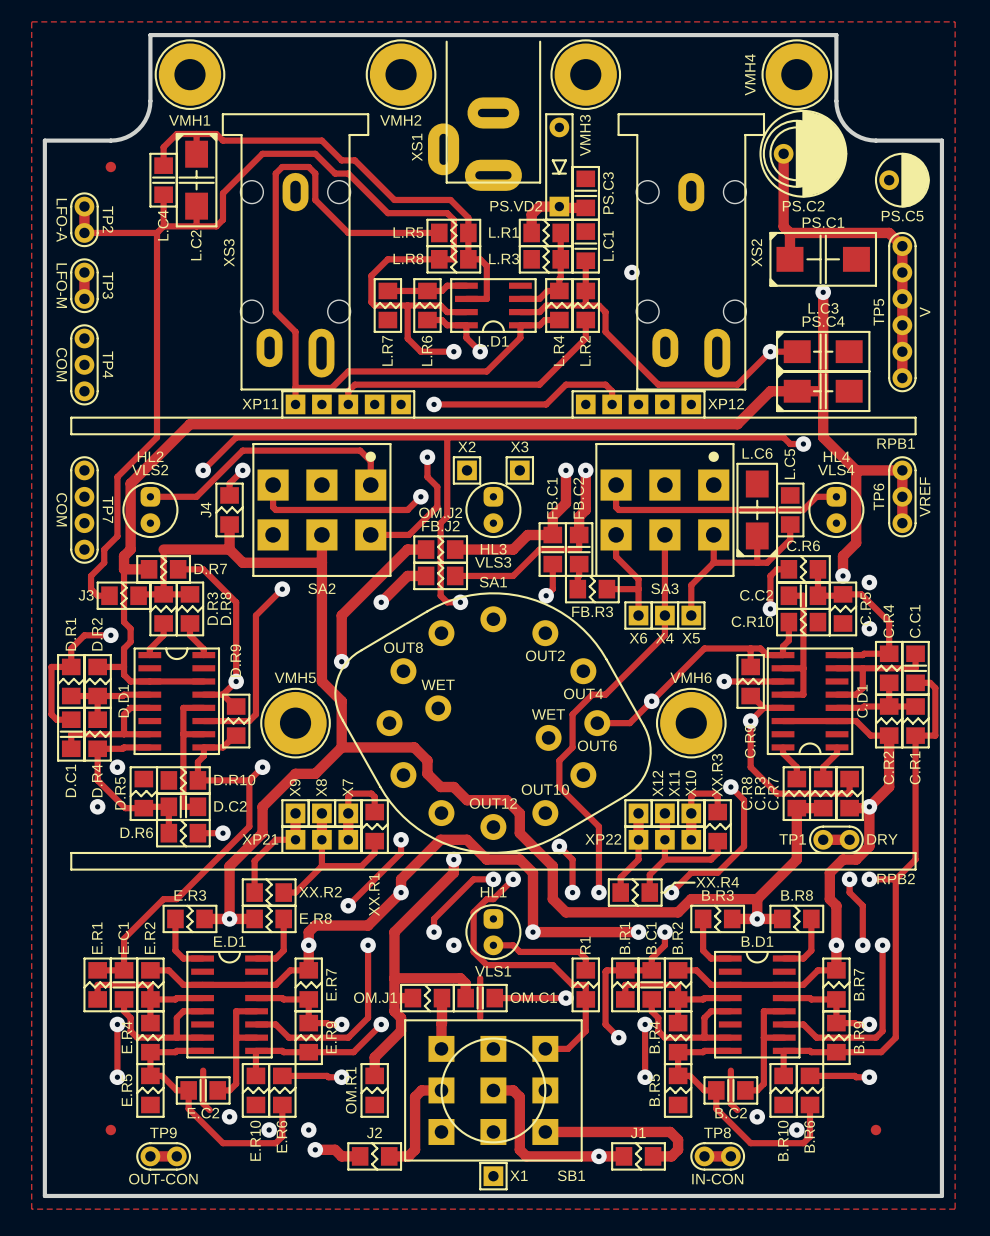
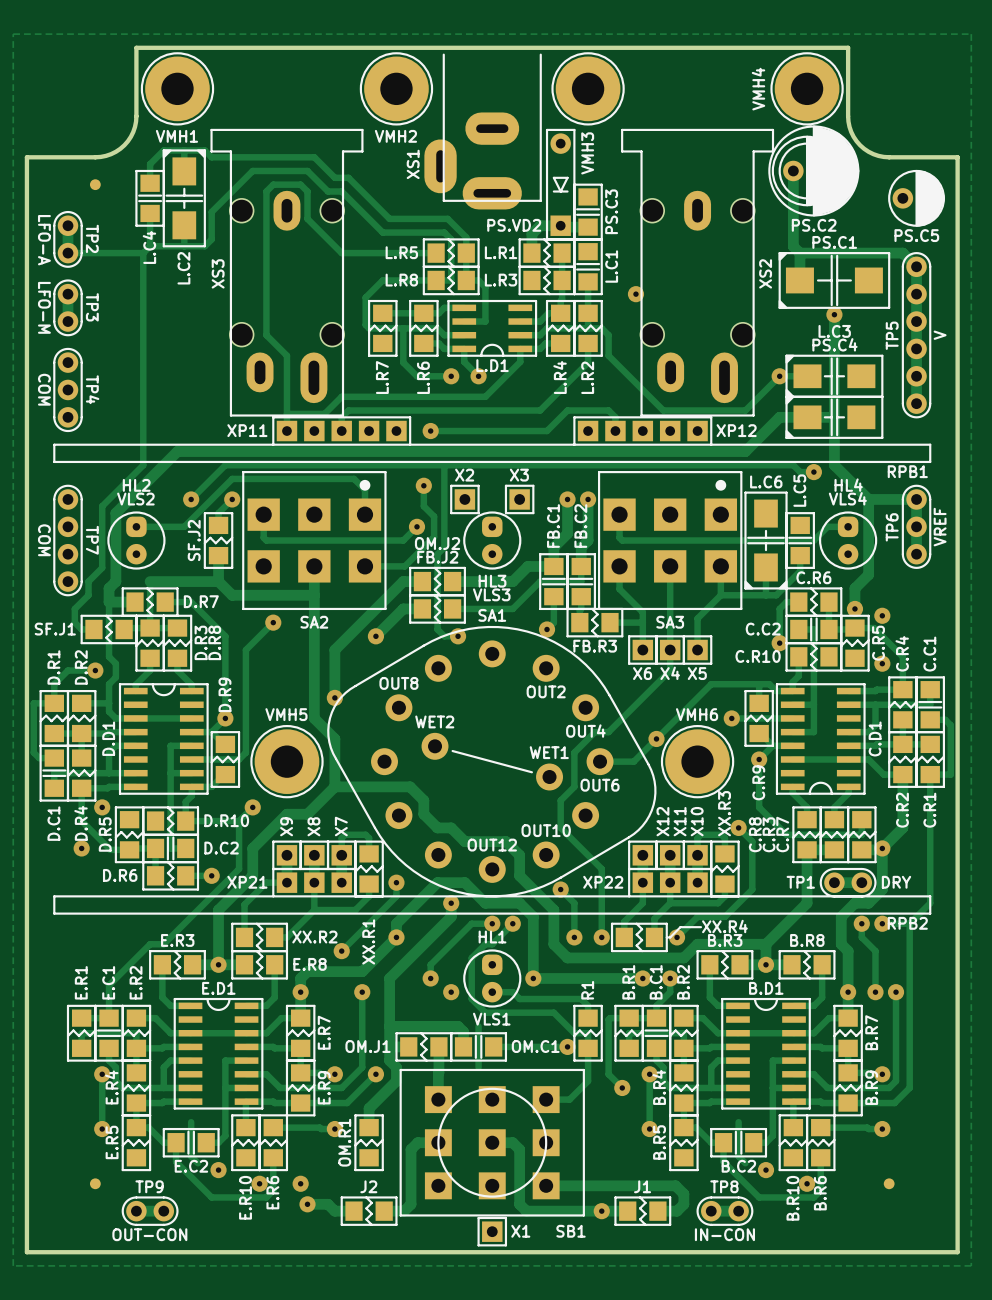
J4 name: J4 (206, 510) -> SF.J2 (194, 540)
J3 name: J3 (86, 595) -> SF.J1 (55, 629)
text: WET (438, 684) -> WET2 (434, 721)
line: none -> (452, 751) (531, 772)
text: WET (548, 714) -> WET1 (549, 752)

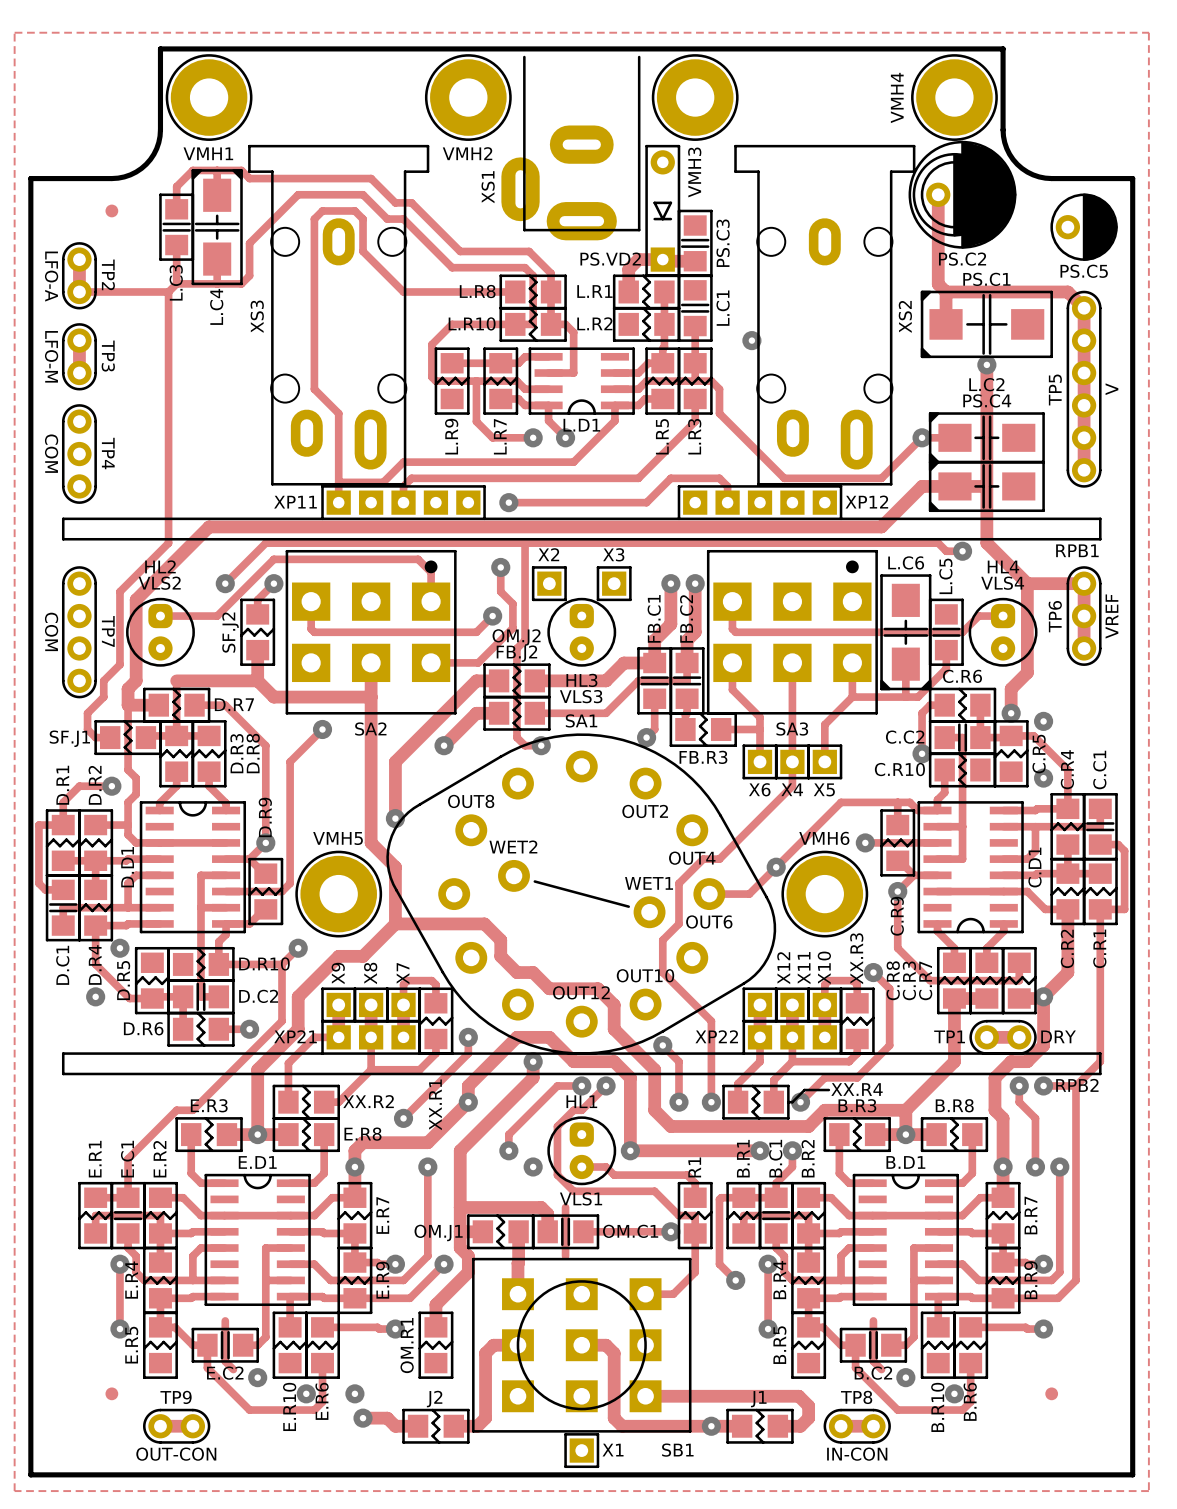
L.C4 name: L.C4 (149, 247) -> L.C3 (176, 282)
L.R5 name: L.R5 (401, 252) -> L.R8 (477, 291)
L.C2 name: L.C2 (183, 268) -> L.C4 (216, 306)
L.R8 name: L.R8 (401, 280) -> L.R10 (472, 323)
L.R3 name: L.R3 (501, 280) -> L.R2 (594, 323)
L.C3 name: L.C3 (834, 331) -> L.C2 (986, 384)
L.R7 name: L.R7 (382, 377) -> L.R9 (451, 436)
L.R6 name: L.R6 (423, 377) -> L.R7 (500, 436)
L.R4 name: L.R4 (560, 377) -> L.R5 (662, 436)
L.R2 name: L.R2 (587, 377) -> L.R3 (694, 436)

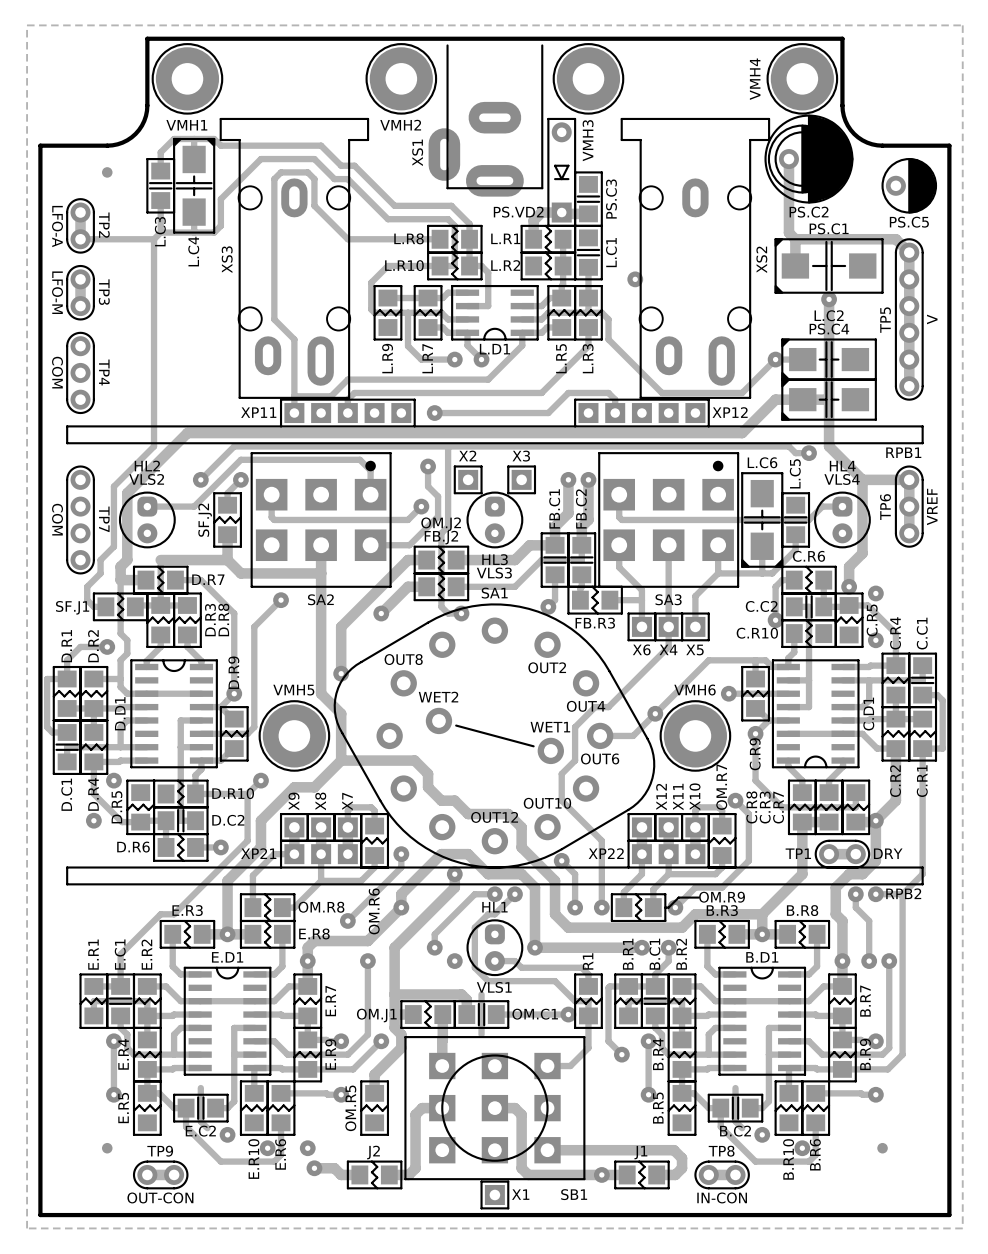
XX.R3 name: XX.R3 (856, 958) -> OM.R7 (721, 787)
XX.R4 name: XX.R4 (857, 1089) -> OM.R9 (722, 897)
XX.R2 name: XX.R2 (368, 1101) -> OM.R8 (321, 907)
XX.R1 name: XX.R1 (435, 1104) -> OM.R6 (374, 911)
OM.R1 name: OM.R1 (407, 1345) -> OM.R5 (350, 1108)

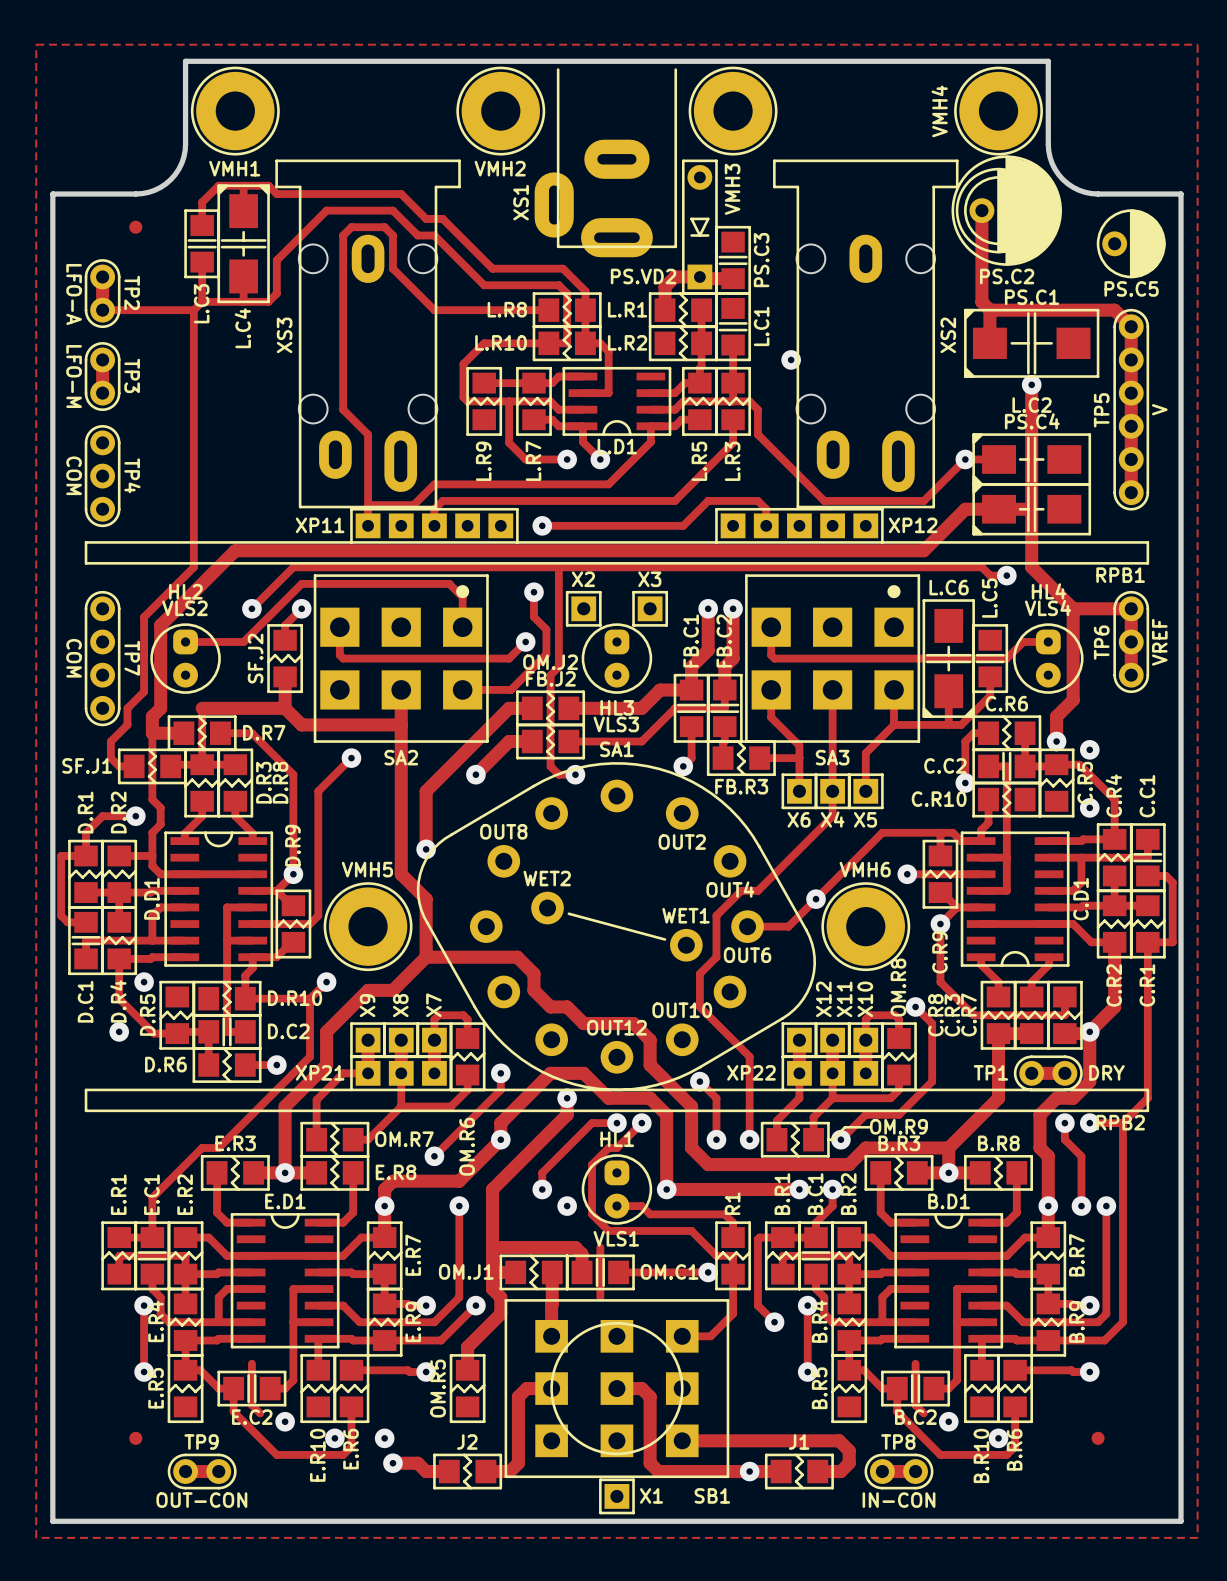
OM.R7 name: OM.R7 (721, 787) -> OM.R8 (898, 987)
OM.R8 name: OM.R8 (321, 907) -> OM.R7 (404, 1139)

